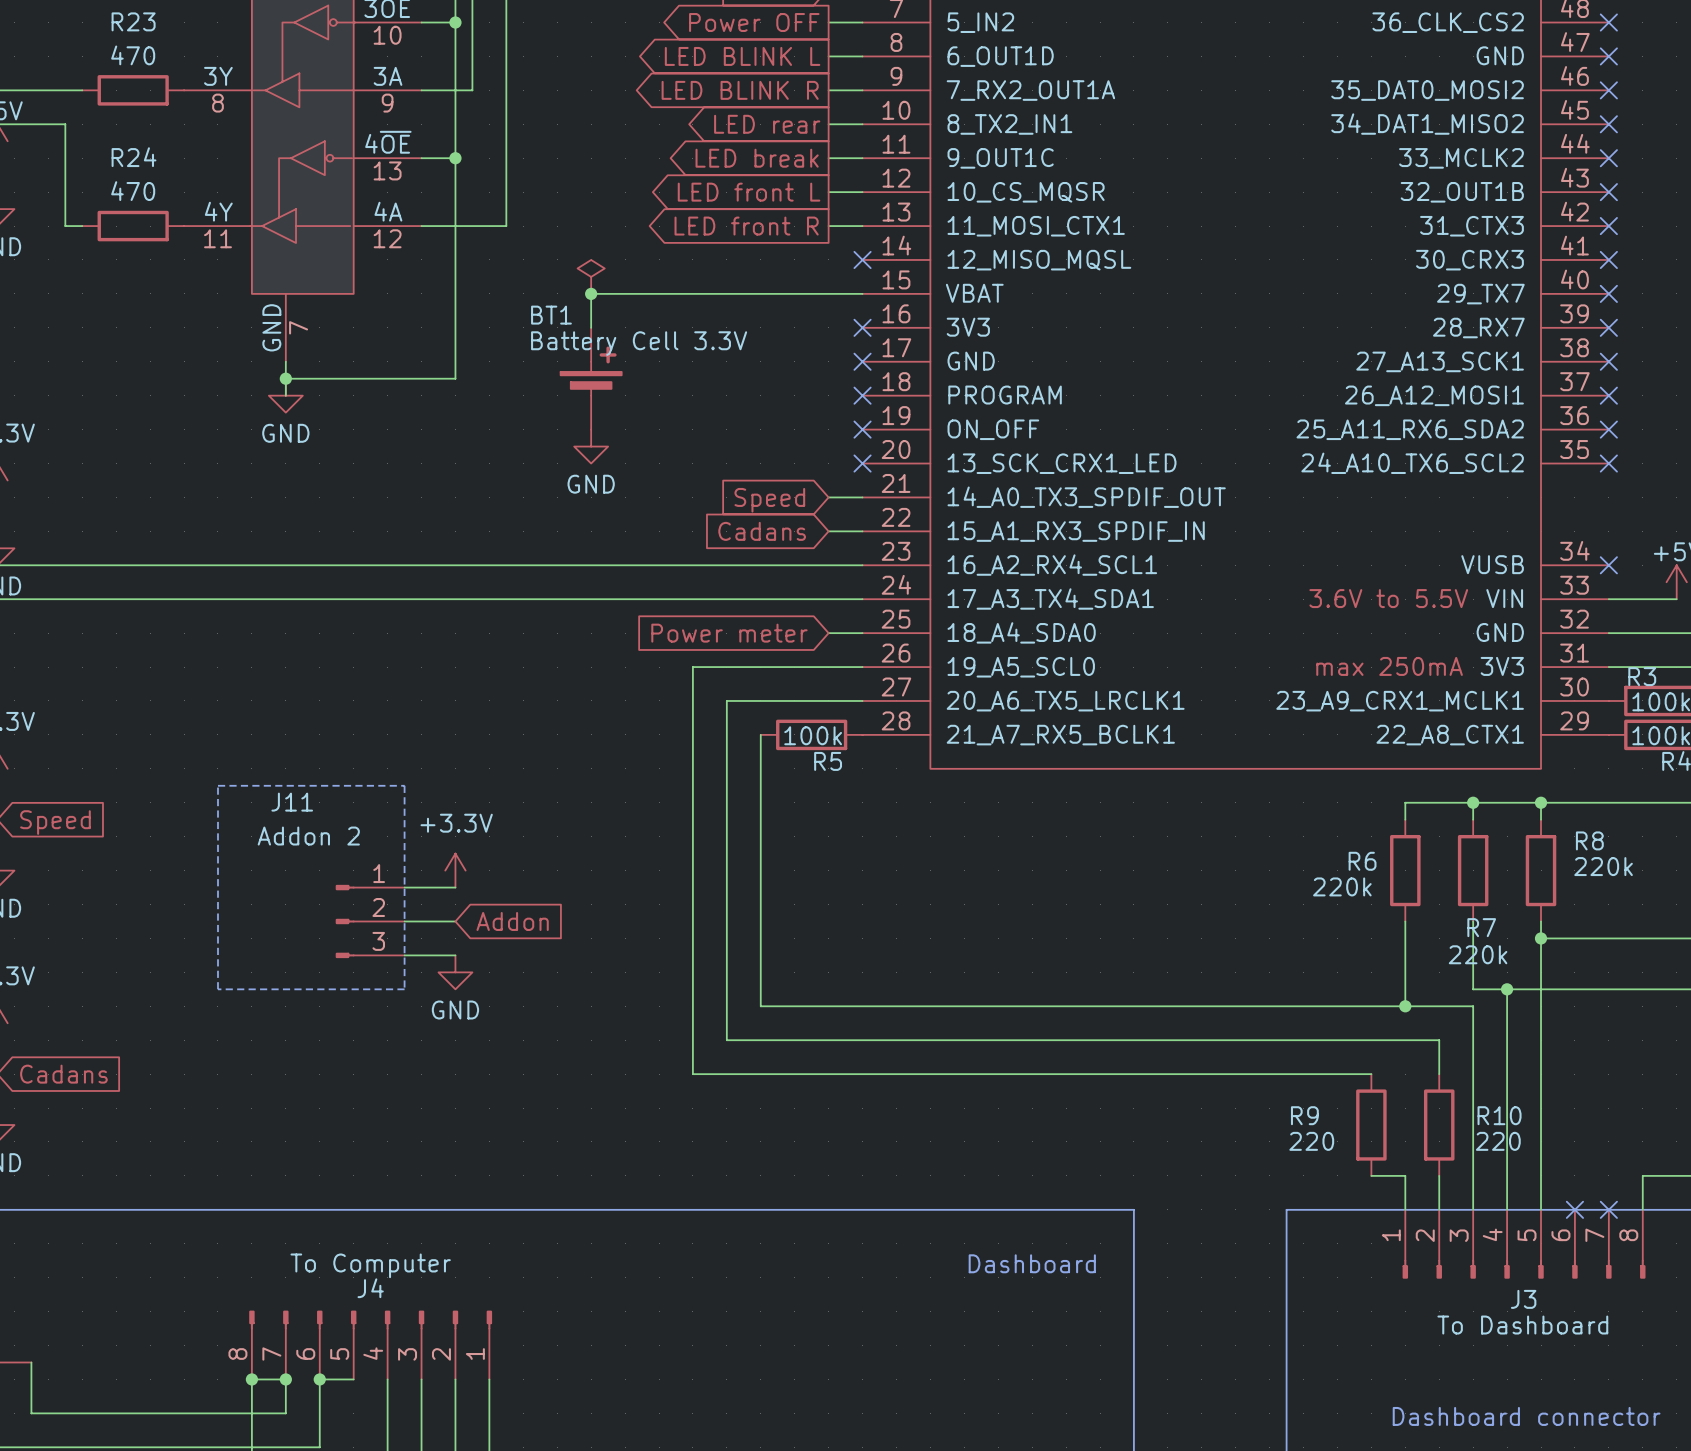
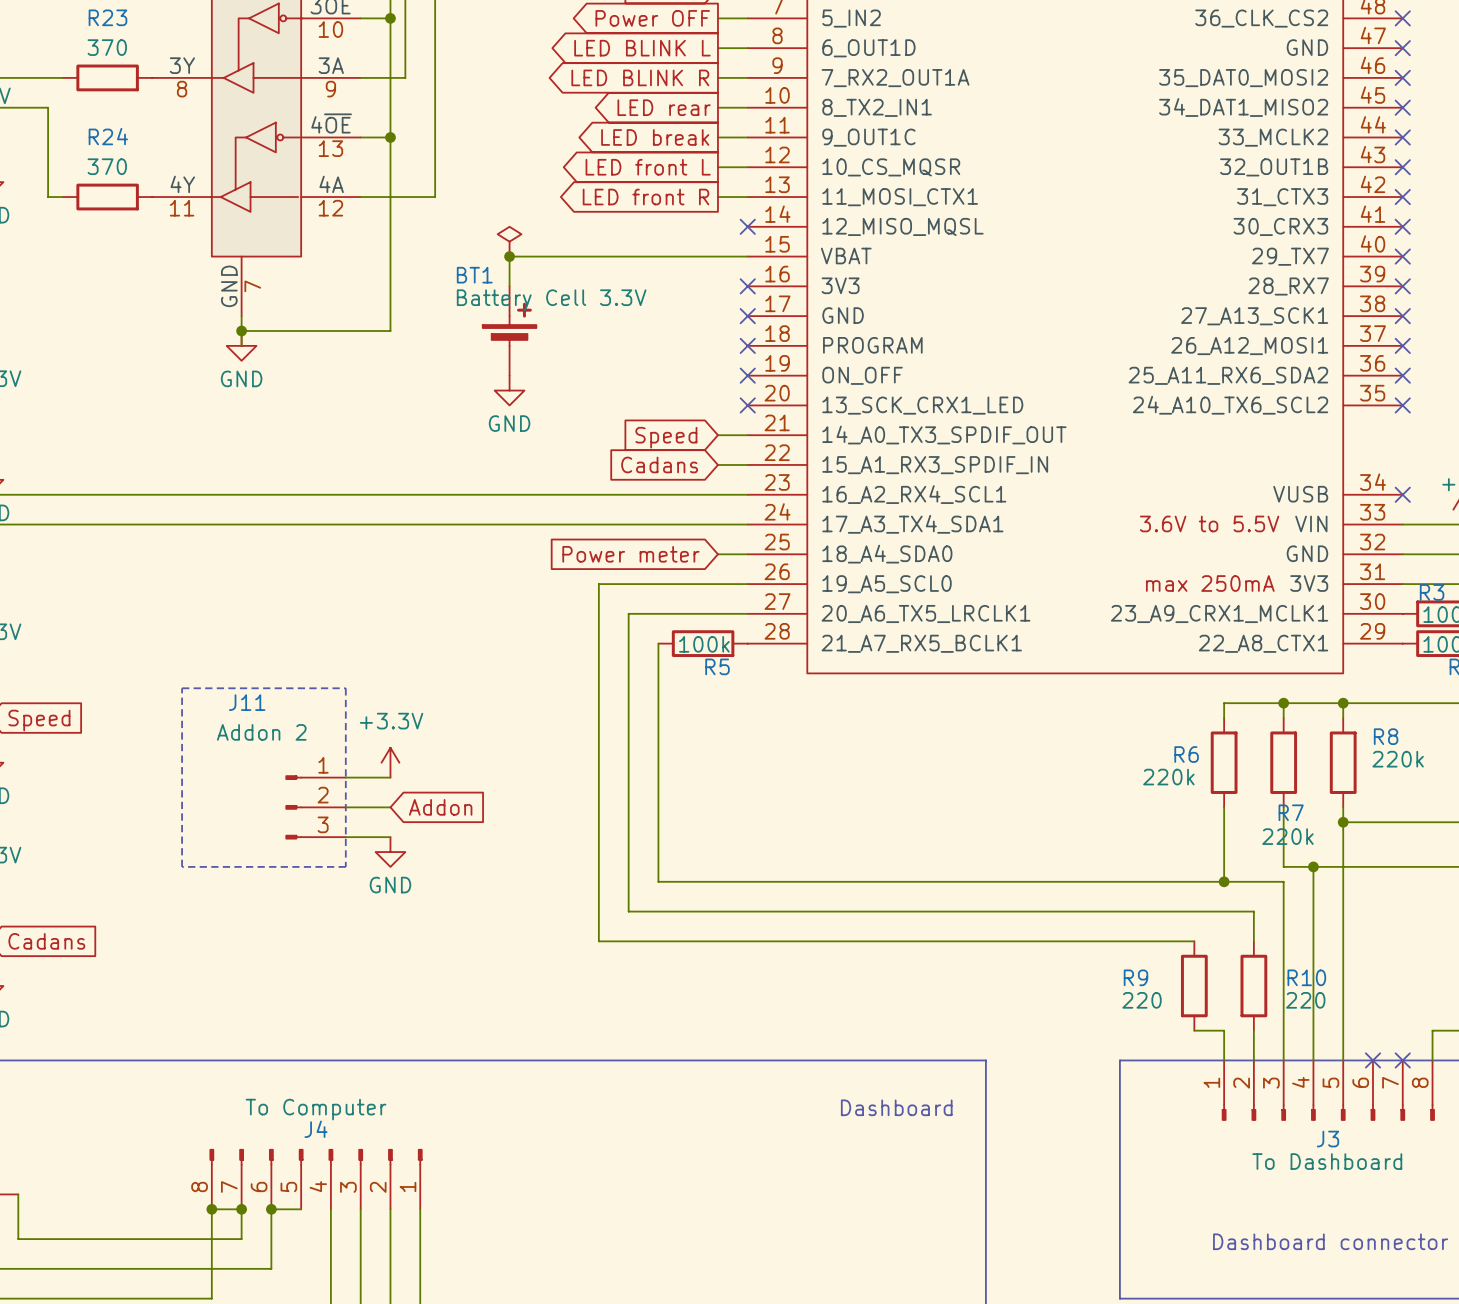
R23 value: 470 (133, 55) -> 370 (107, 47)
R24 value: 470 (133, 191) -> 370 (107, 166)

